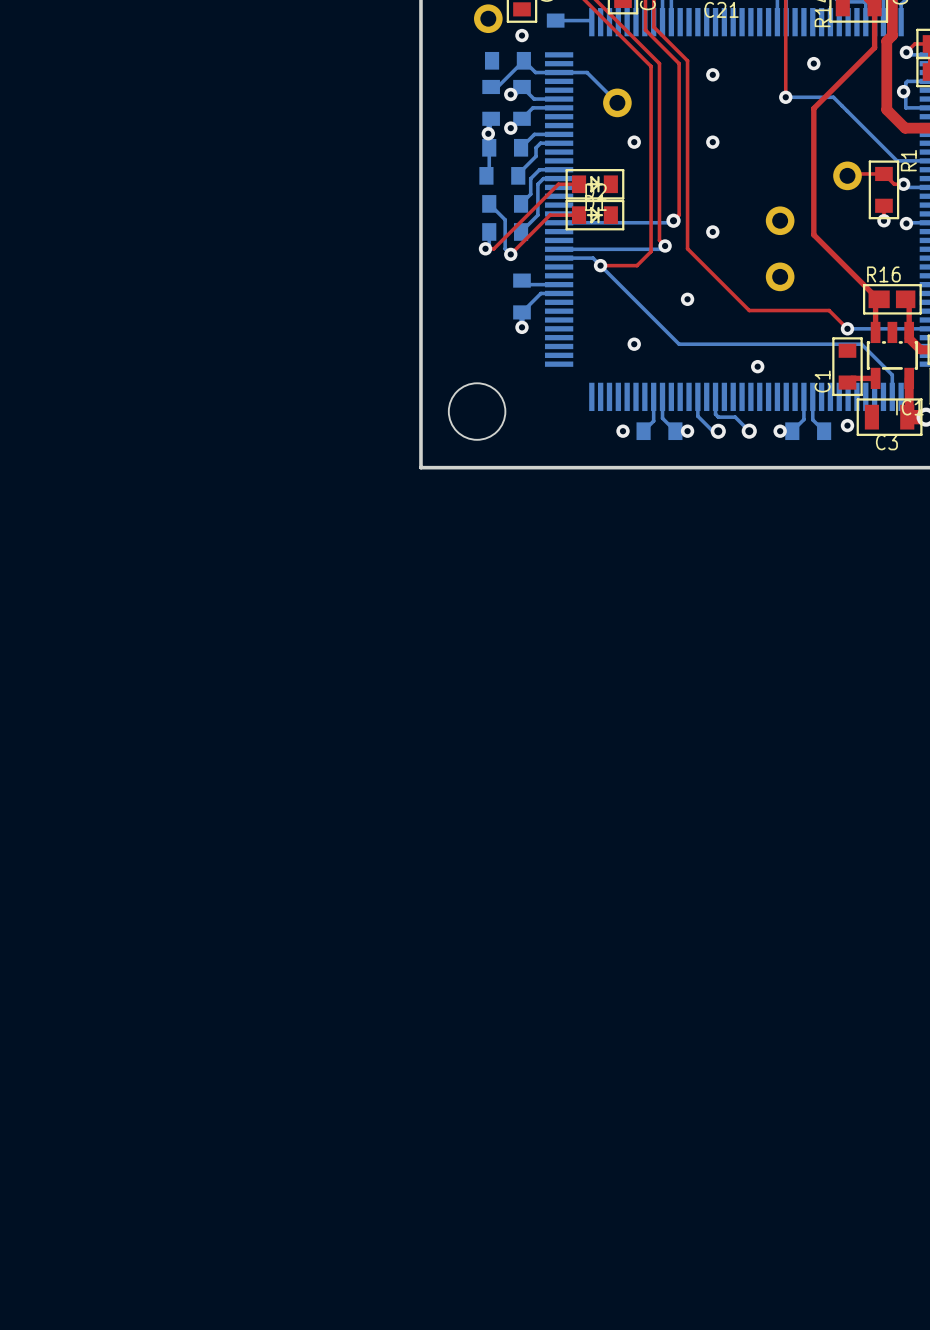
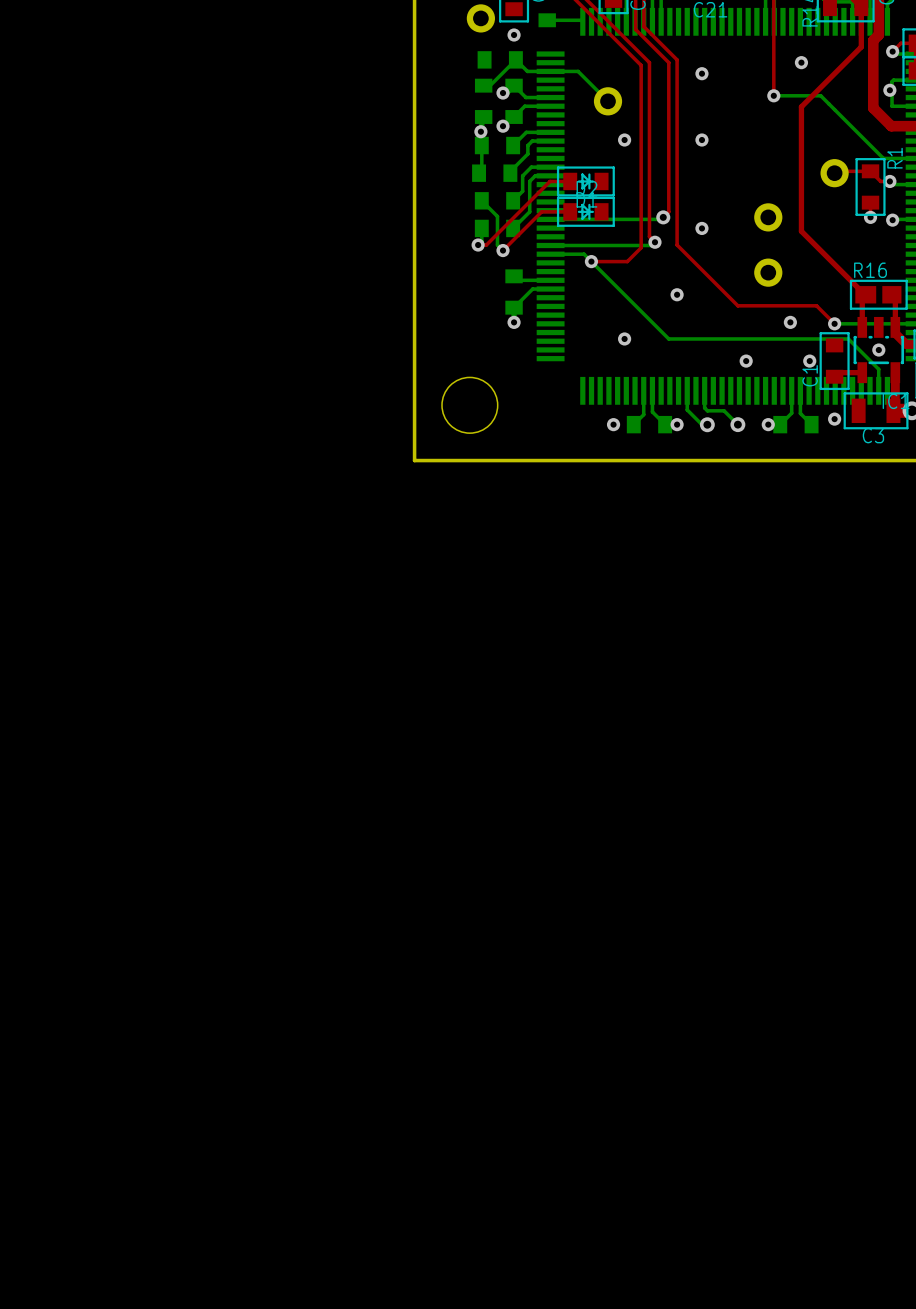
via: none -> (790, 322)
via: none -> (878, 350)
via: none -> (809, 361)

